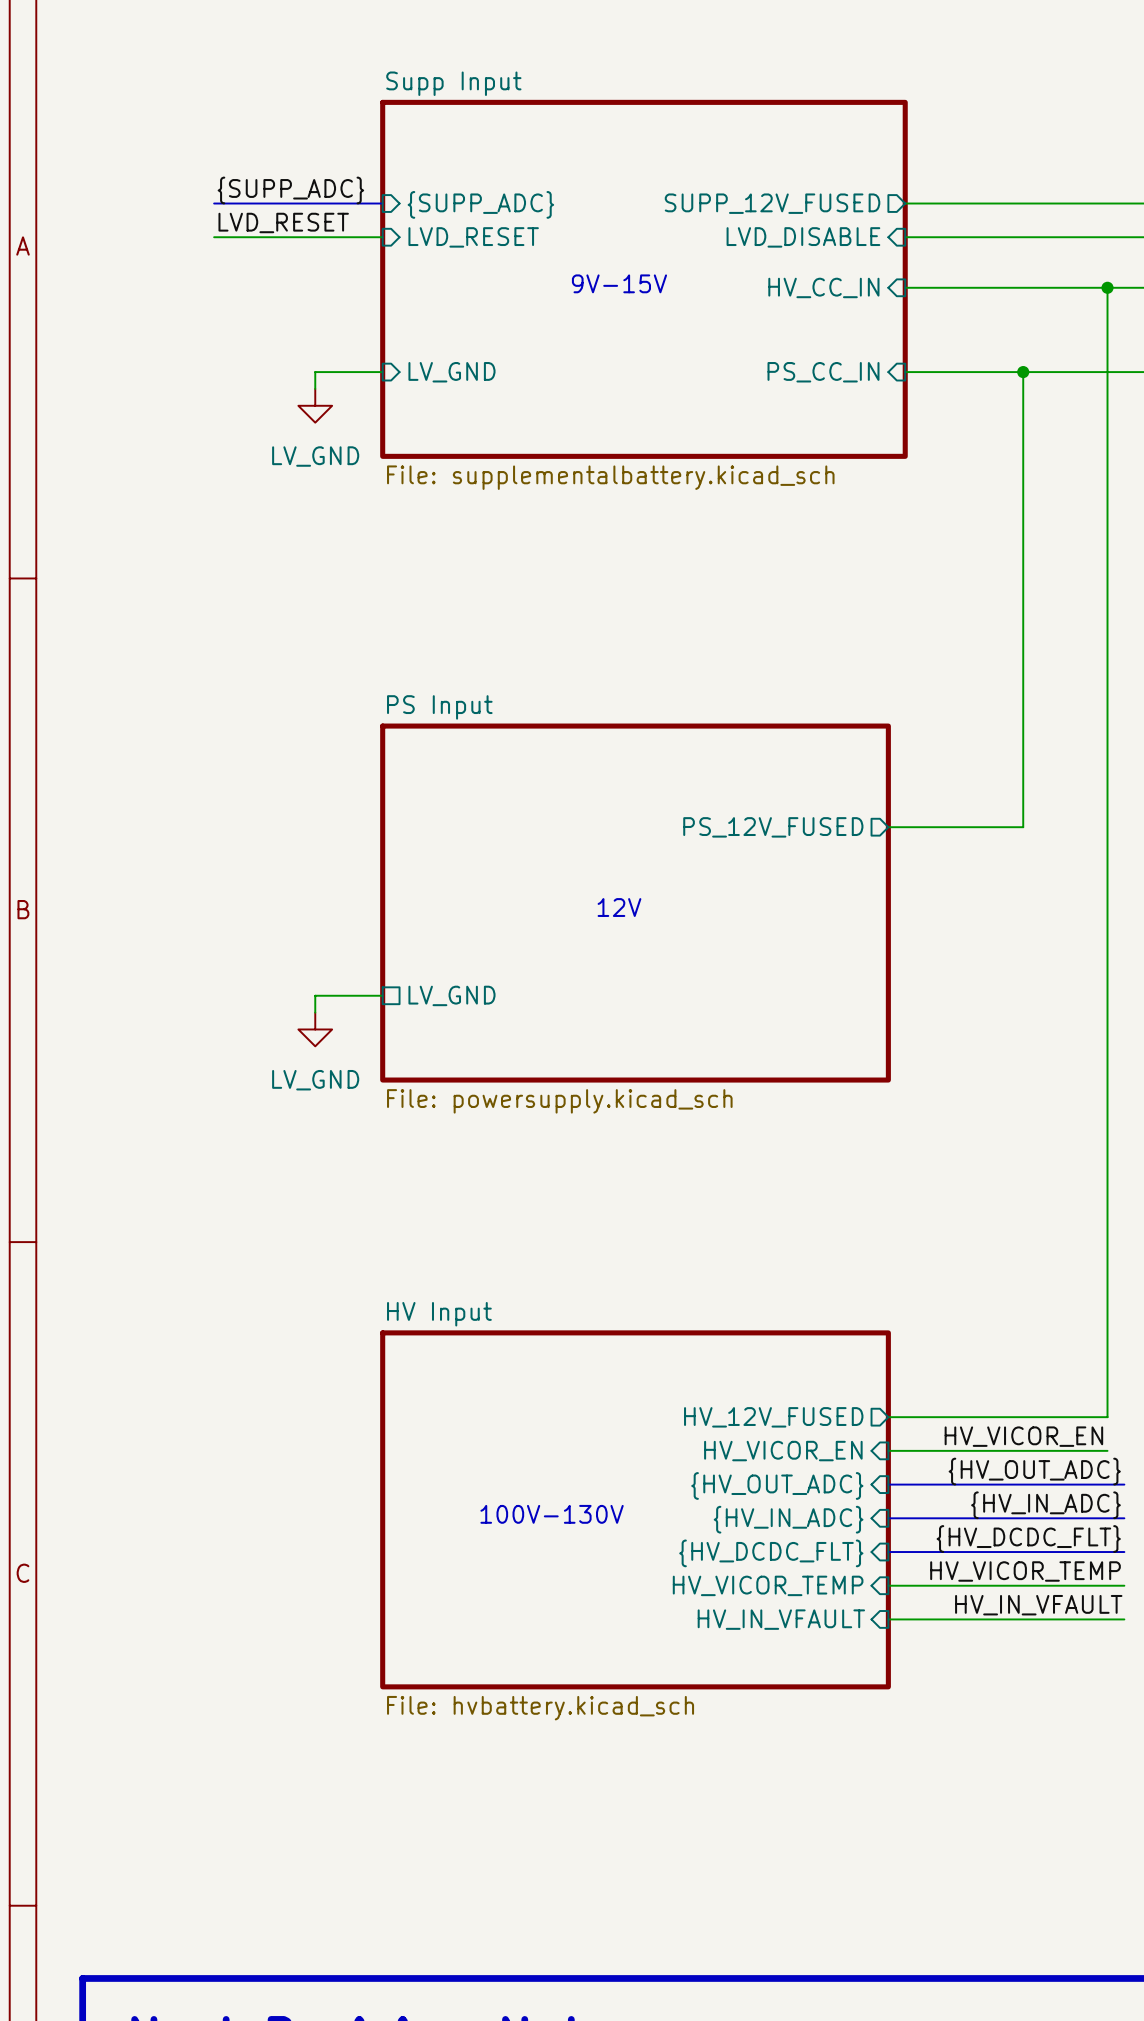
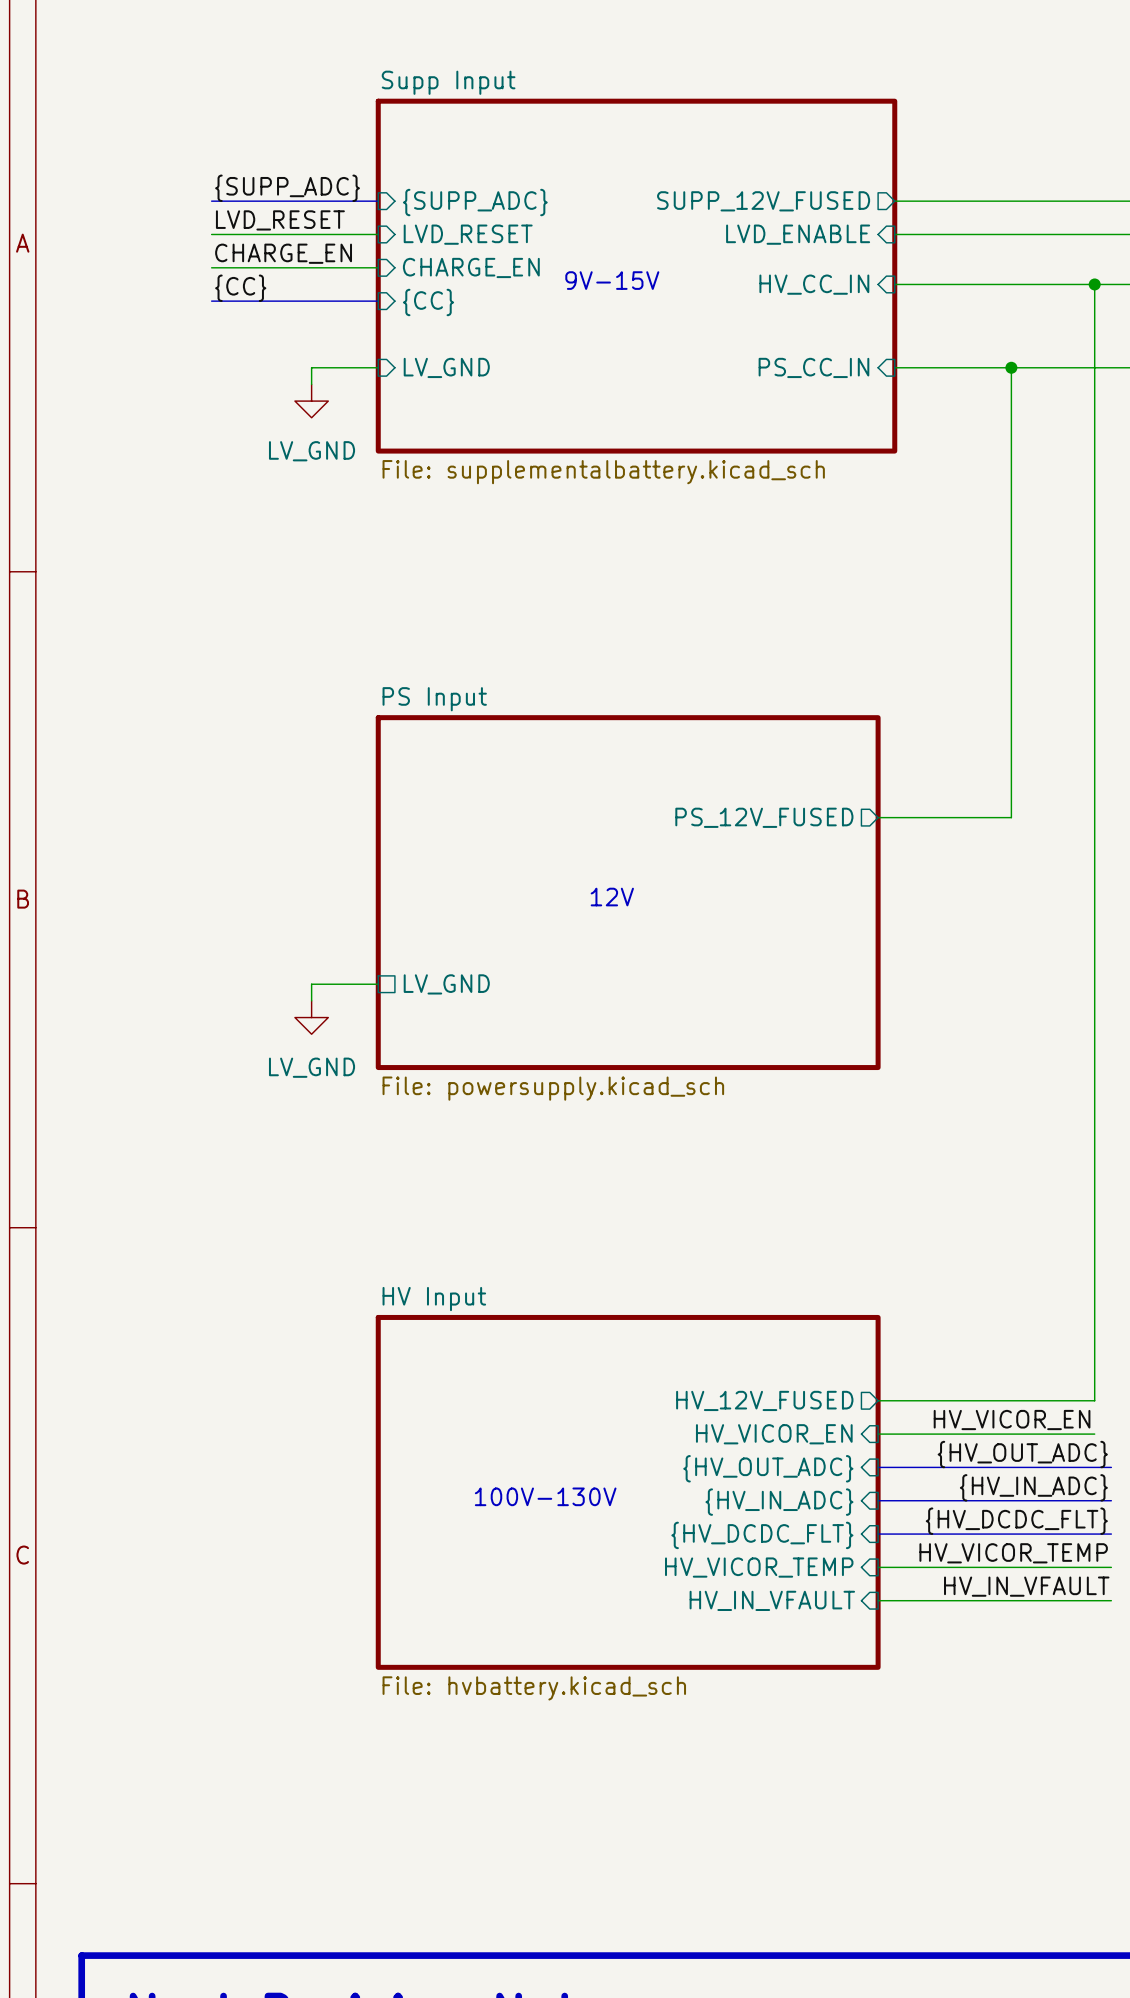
sheet pin: LVD_DISABLE (803, 237) -> LVD_ENABLE (798, 234)
label: none -> CHARGE_EN (283, 253)
wire: none -> (211, 267) (378, 267)
sheet pin: none -> CHARGE_EN (471, 267)
label: none -> {CC} (240, 288)
bus: none -> (211, 301) (378, 301)
sheet pin: none -> {CC} (428, 302)

